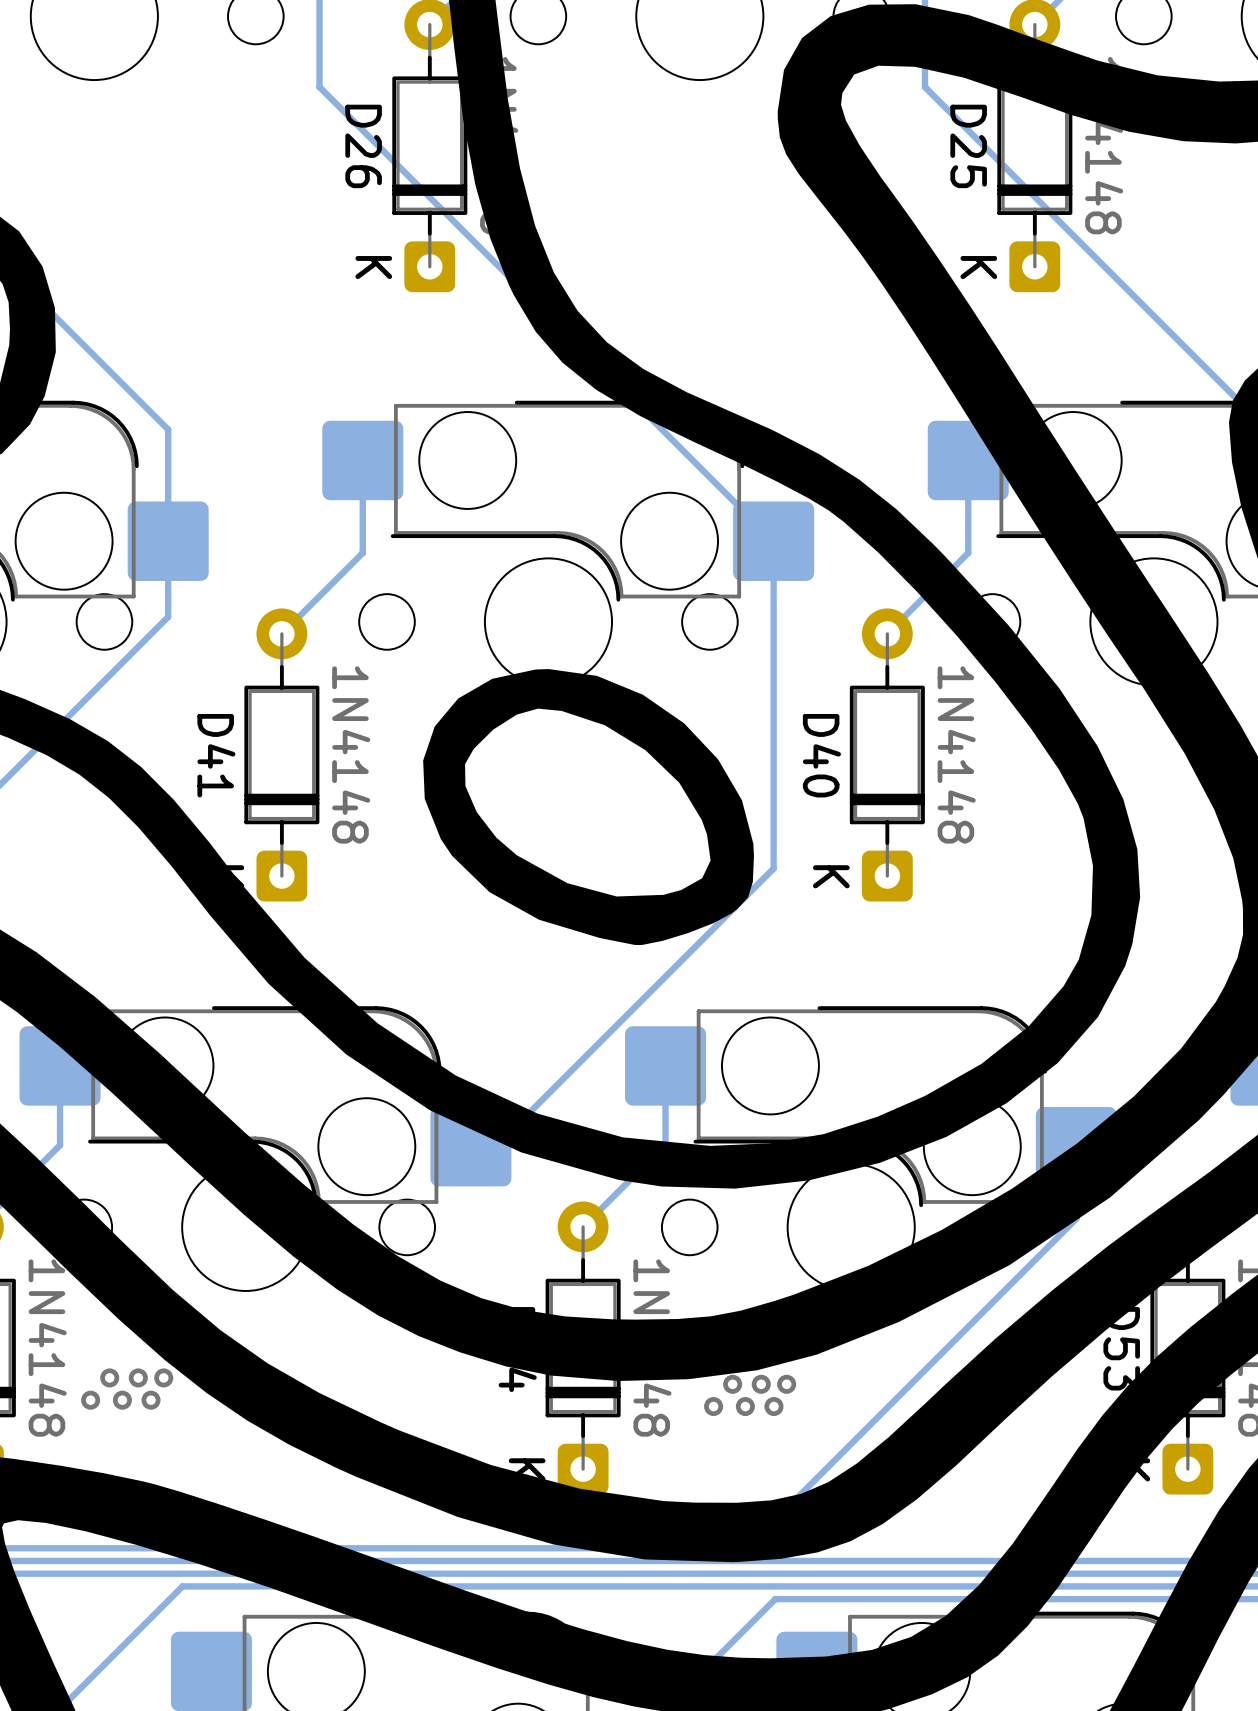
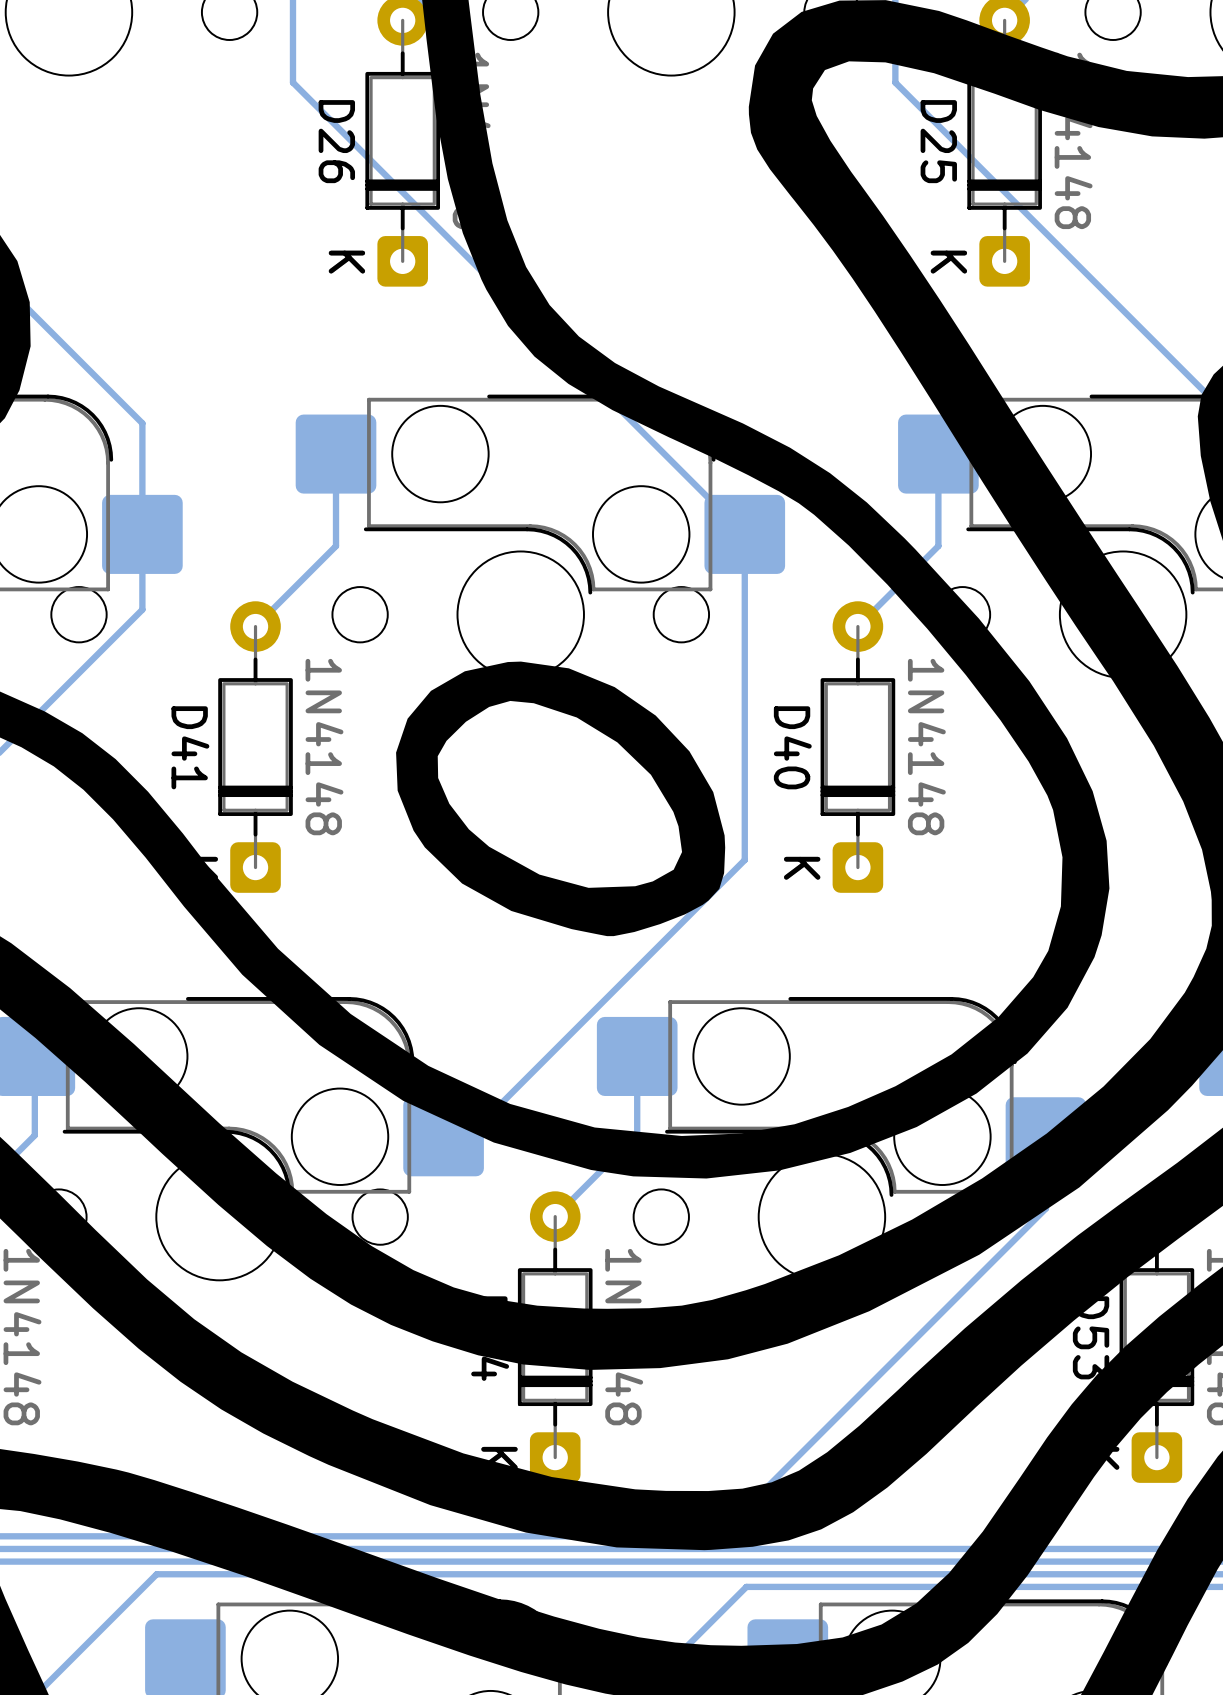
via: (109, 1377) -> none
via: (138, 1377) -> none
via: (163, 1377) -> none
via: (732, 1384) -> none
via: (761, 1384) -> none
via: (786, 1384) -> none
via: (90, 1400) -> none
via: (122, 1400) -> none
via: (151, 1400) -> none
via: (713, 1406) -> none
via: (745, 1406) -> none
via: (773, 1406) -> none

